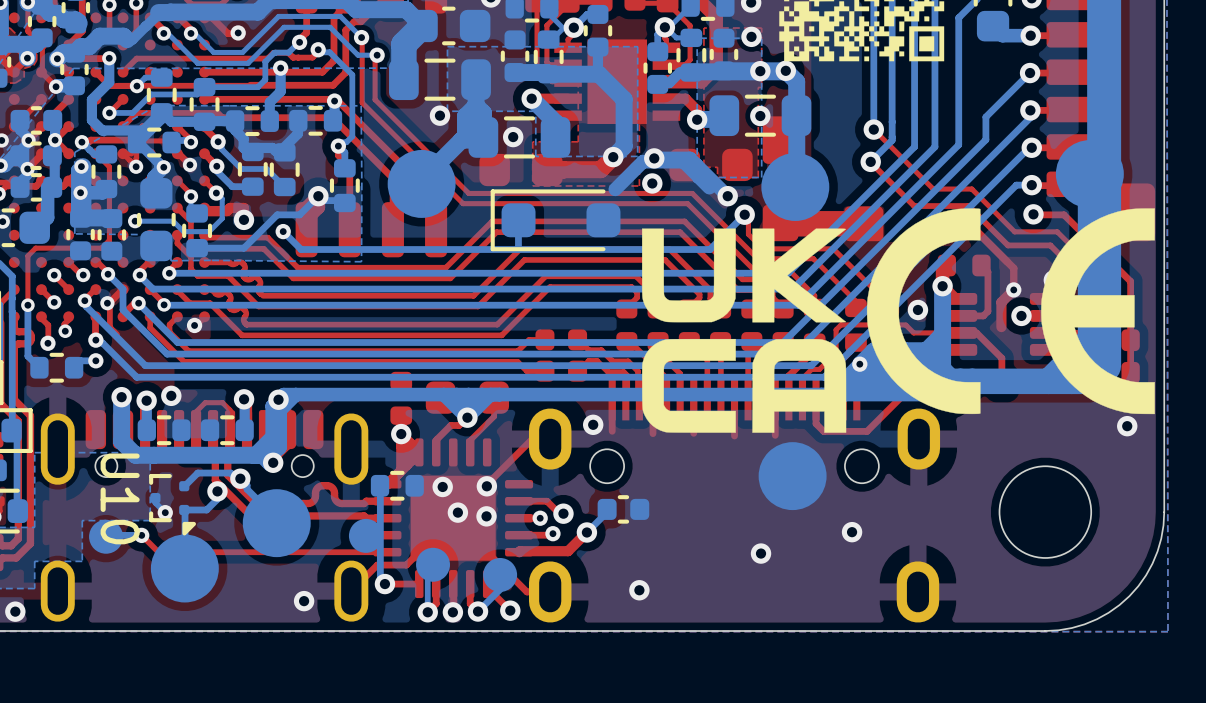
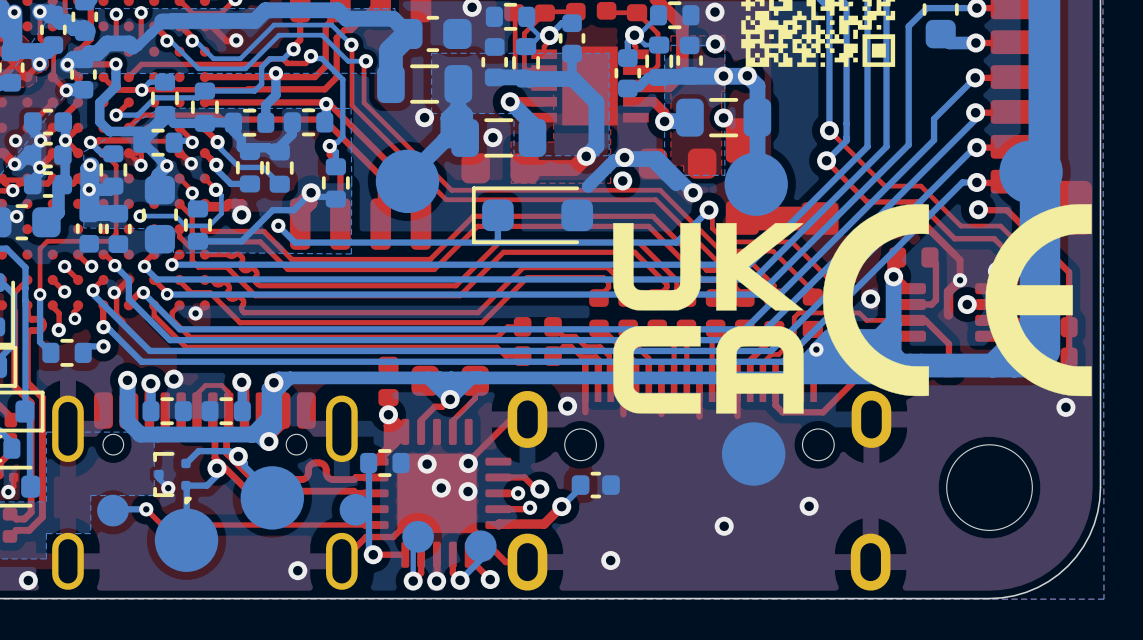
part: none -> (172, 478)
U10: (172, 504) -> none

